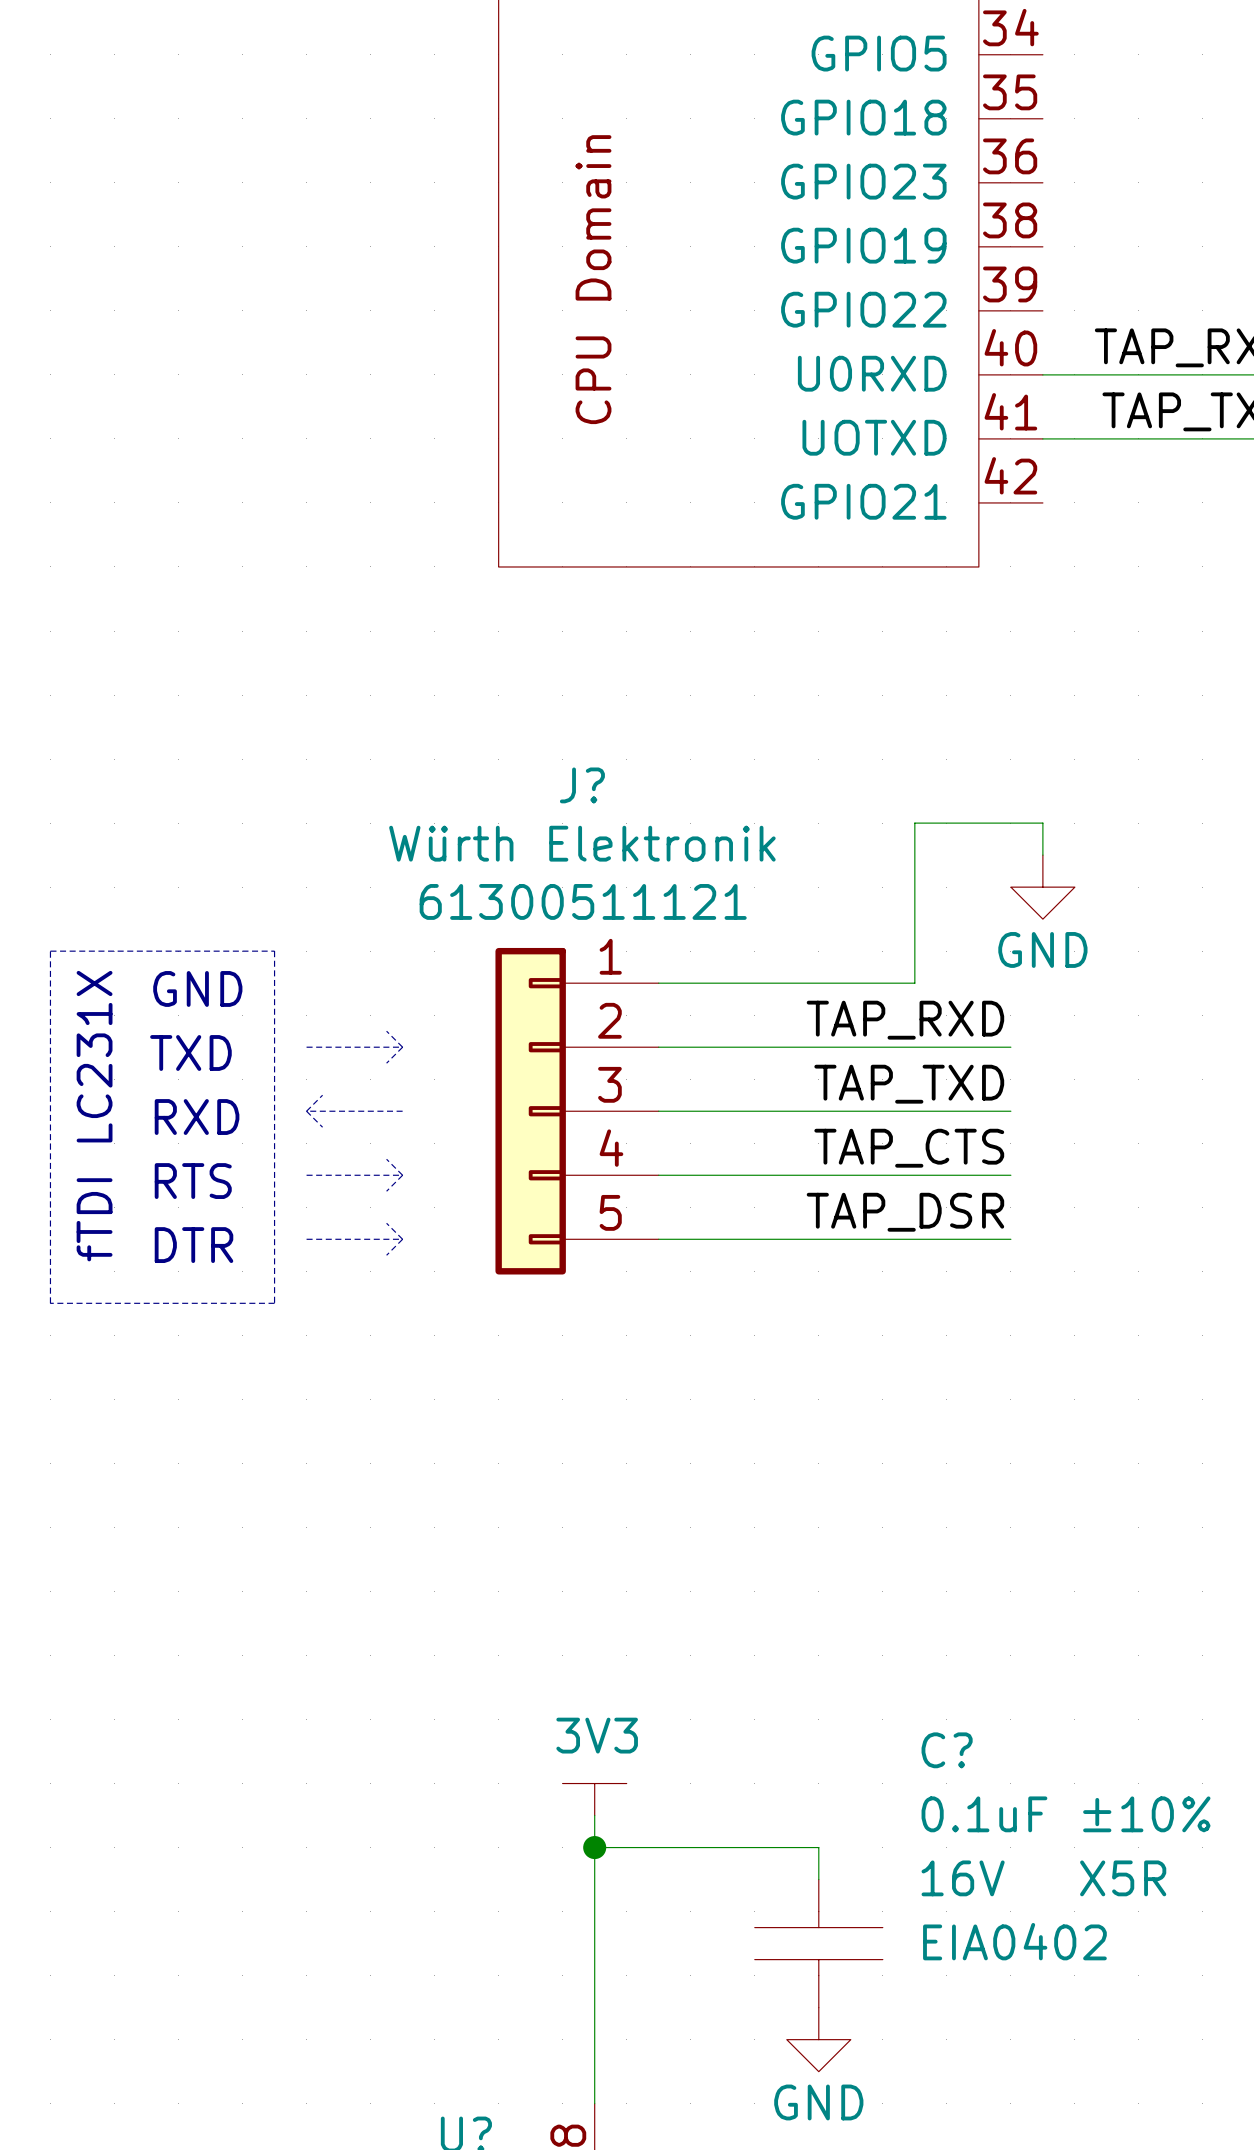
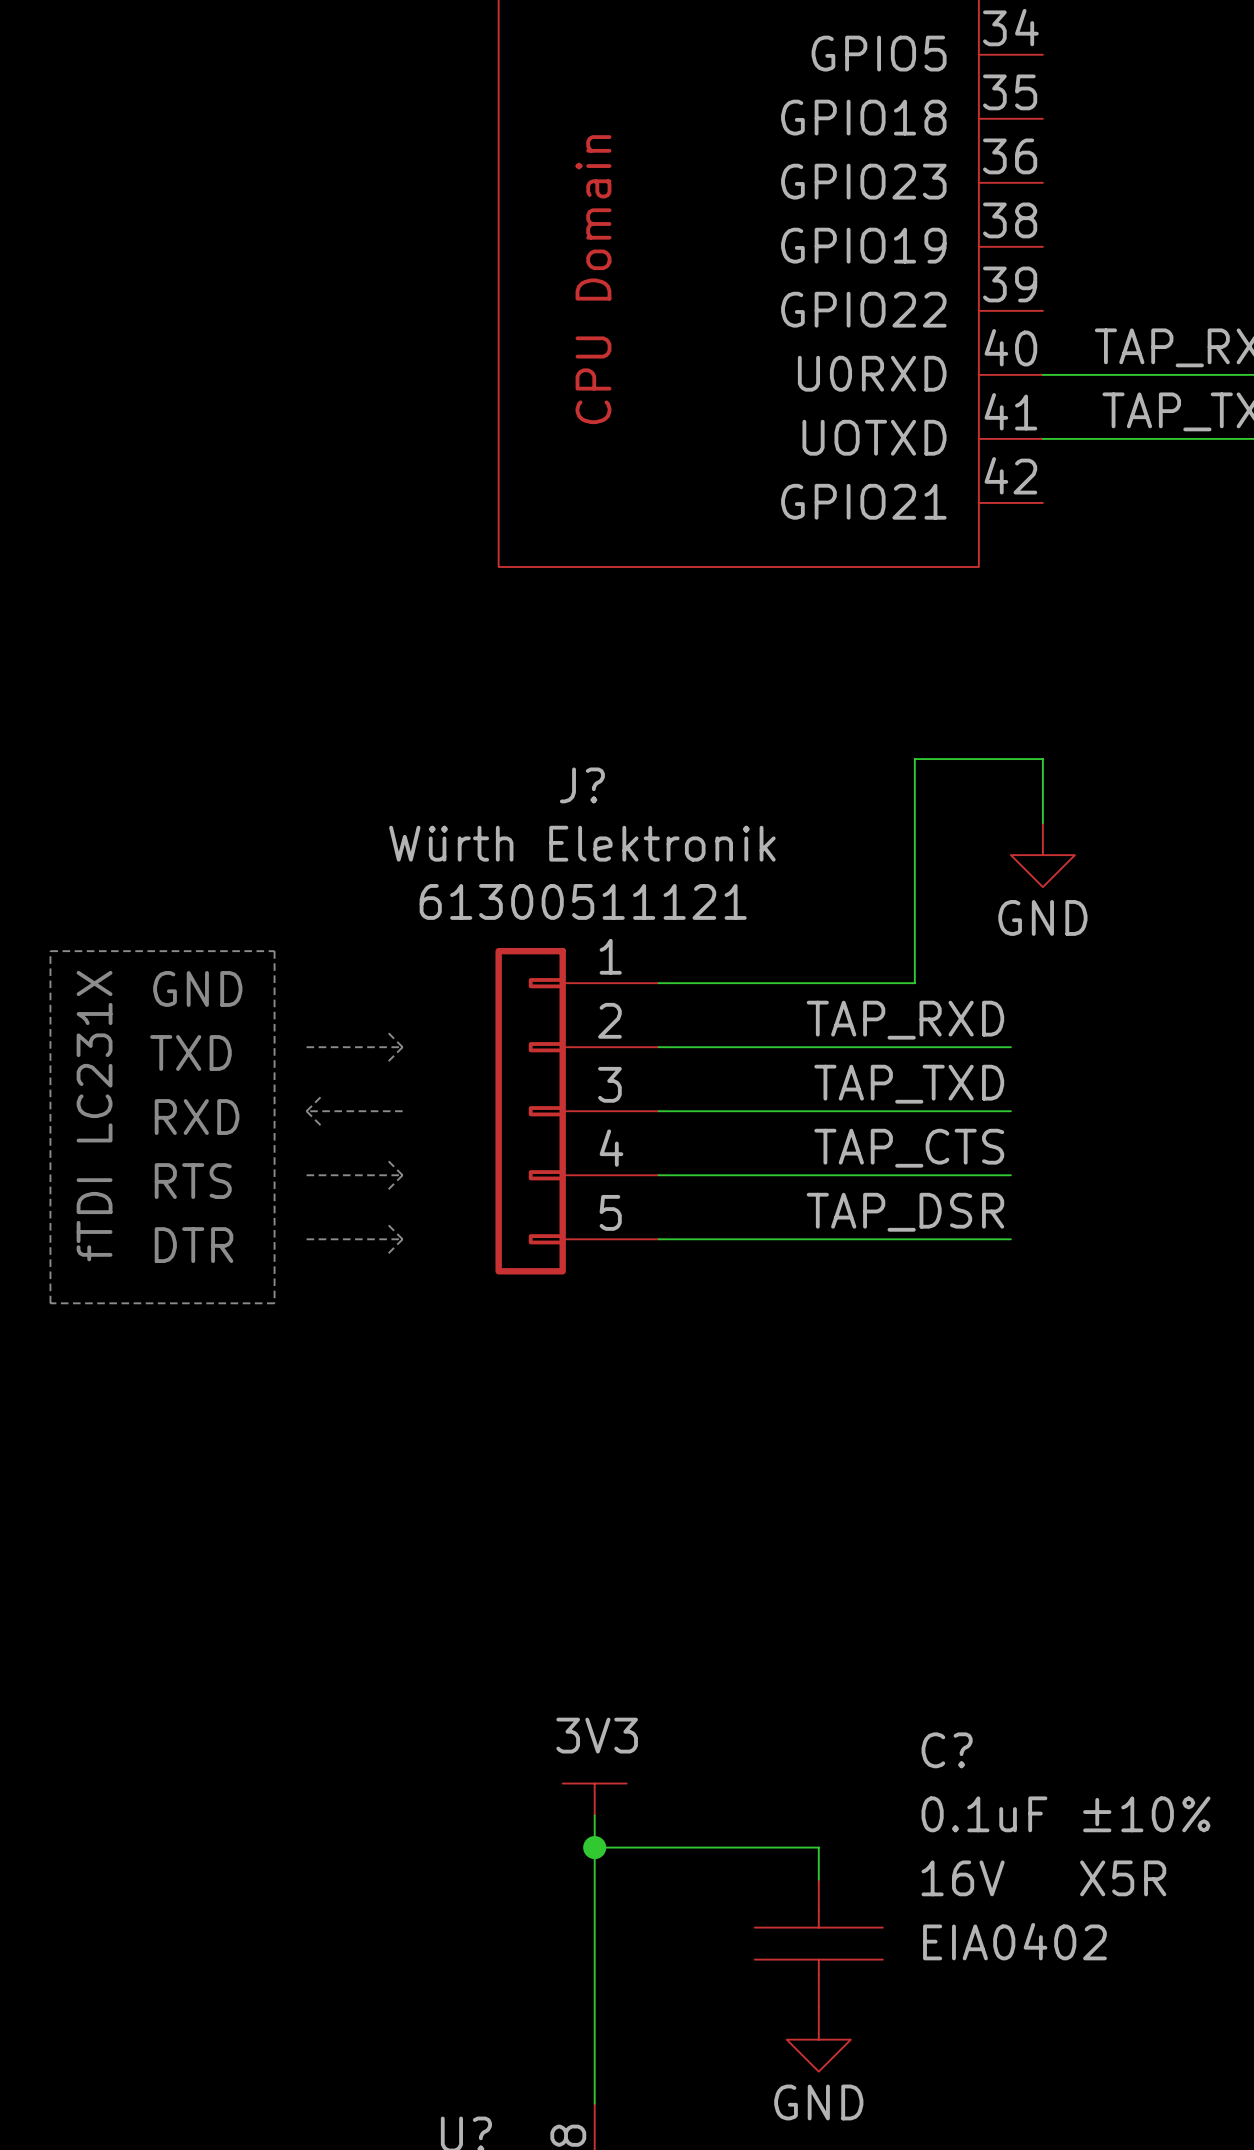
wire: (914, 823) (1042, 823) (1042, 855) -> (914, 823) (914, 759) (1042, 759) (1042, 823)
power symbol position: GND (1042, 887) -> GND (1042, 855)

